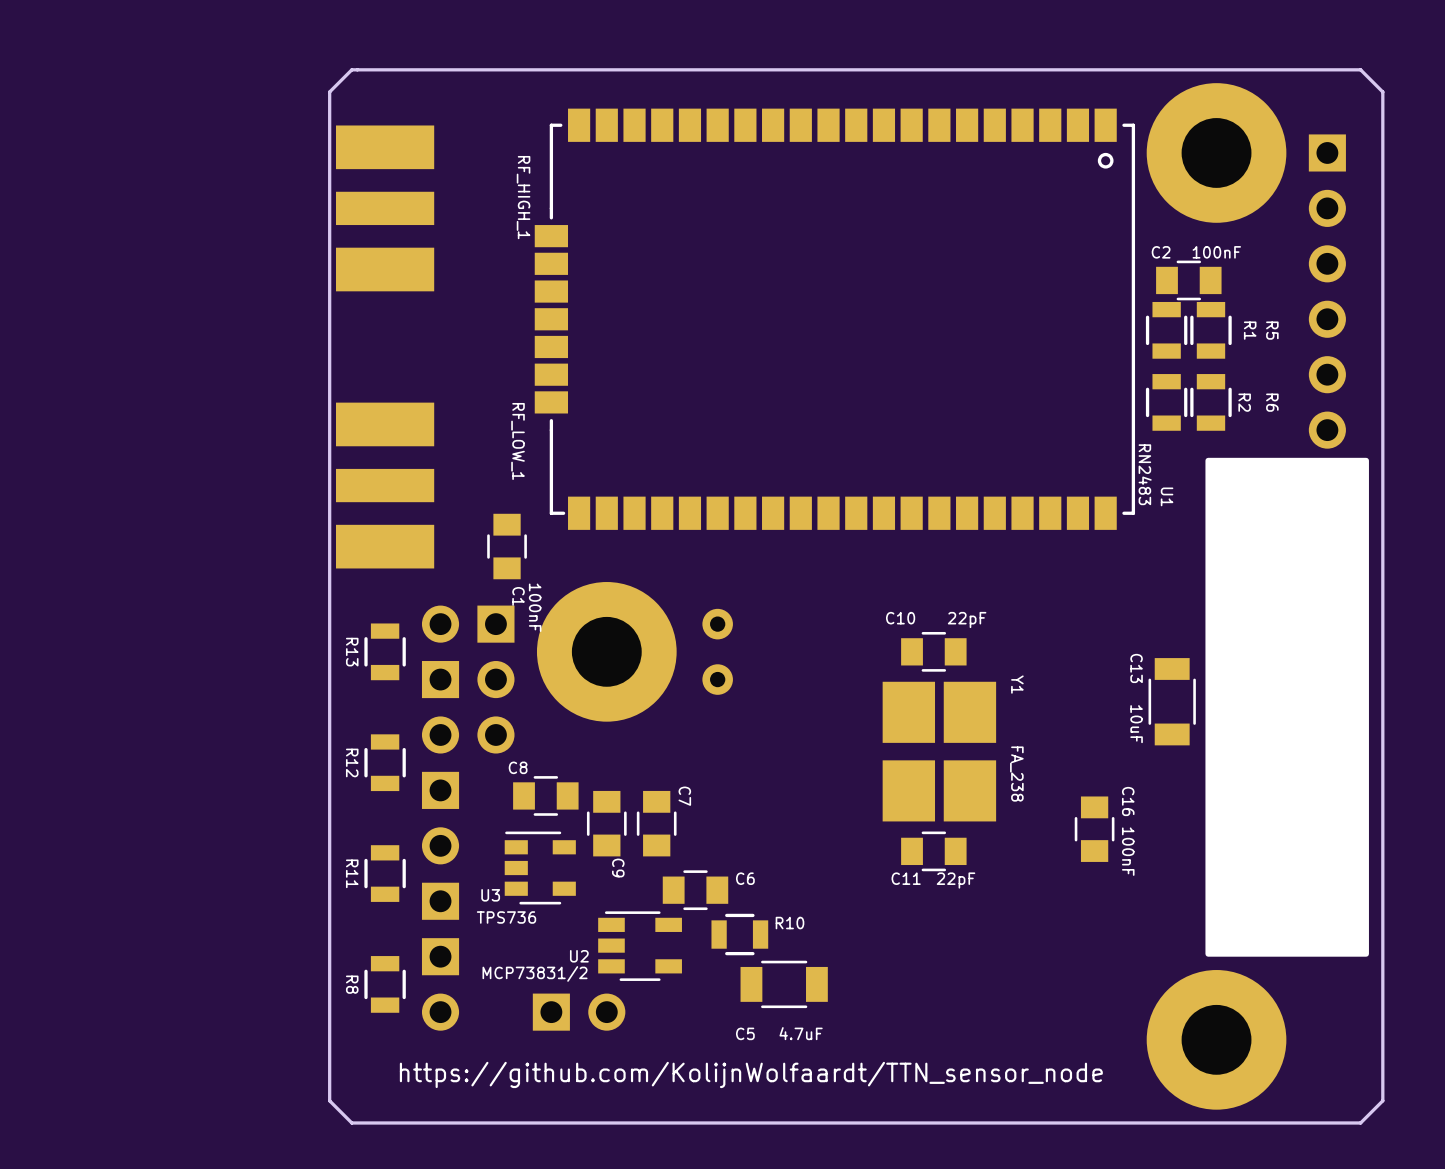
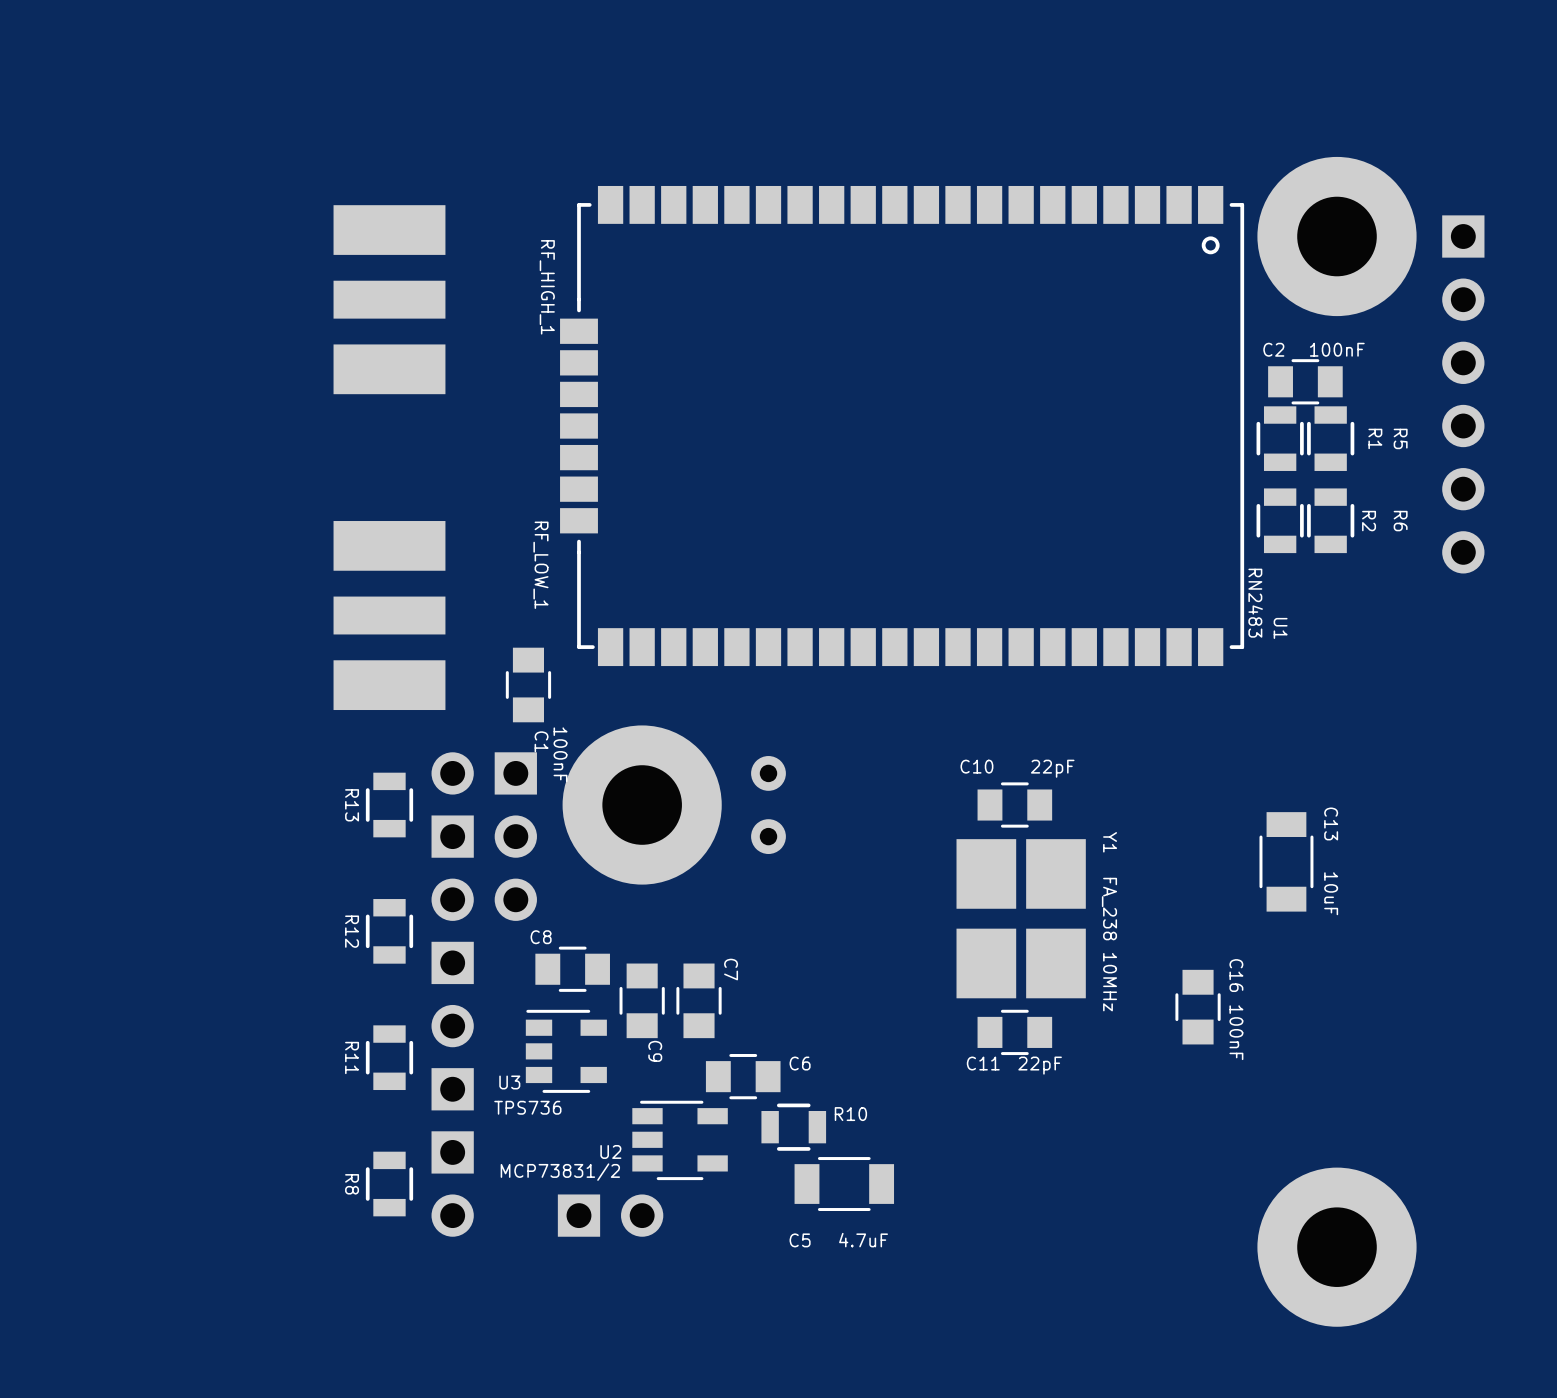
board edge: (1360, 69) (351, 69) (329, 92) (329, 1100) (351, 1122) (1360, 1122) (1382, 1100) (1382, 92) (1360, 69) -> none
drawing: [1205, 457, 1369, 957] -> none
C13 name position: C13 (1136, 668) -> C13 (1331, 823)
C13 value position: 10uF (1136, 724) -> 10uF (1331, 893)
Y1 value: FA_238 (1016, 774) -> FA_238 10MHz (1109, 944)
text: https://github.com/KolijnWolfaardt/TTN_sensor_node (751, 1074) -> none

